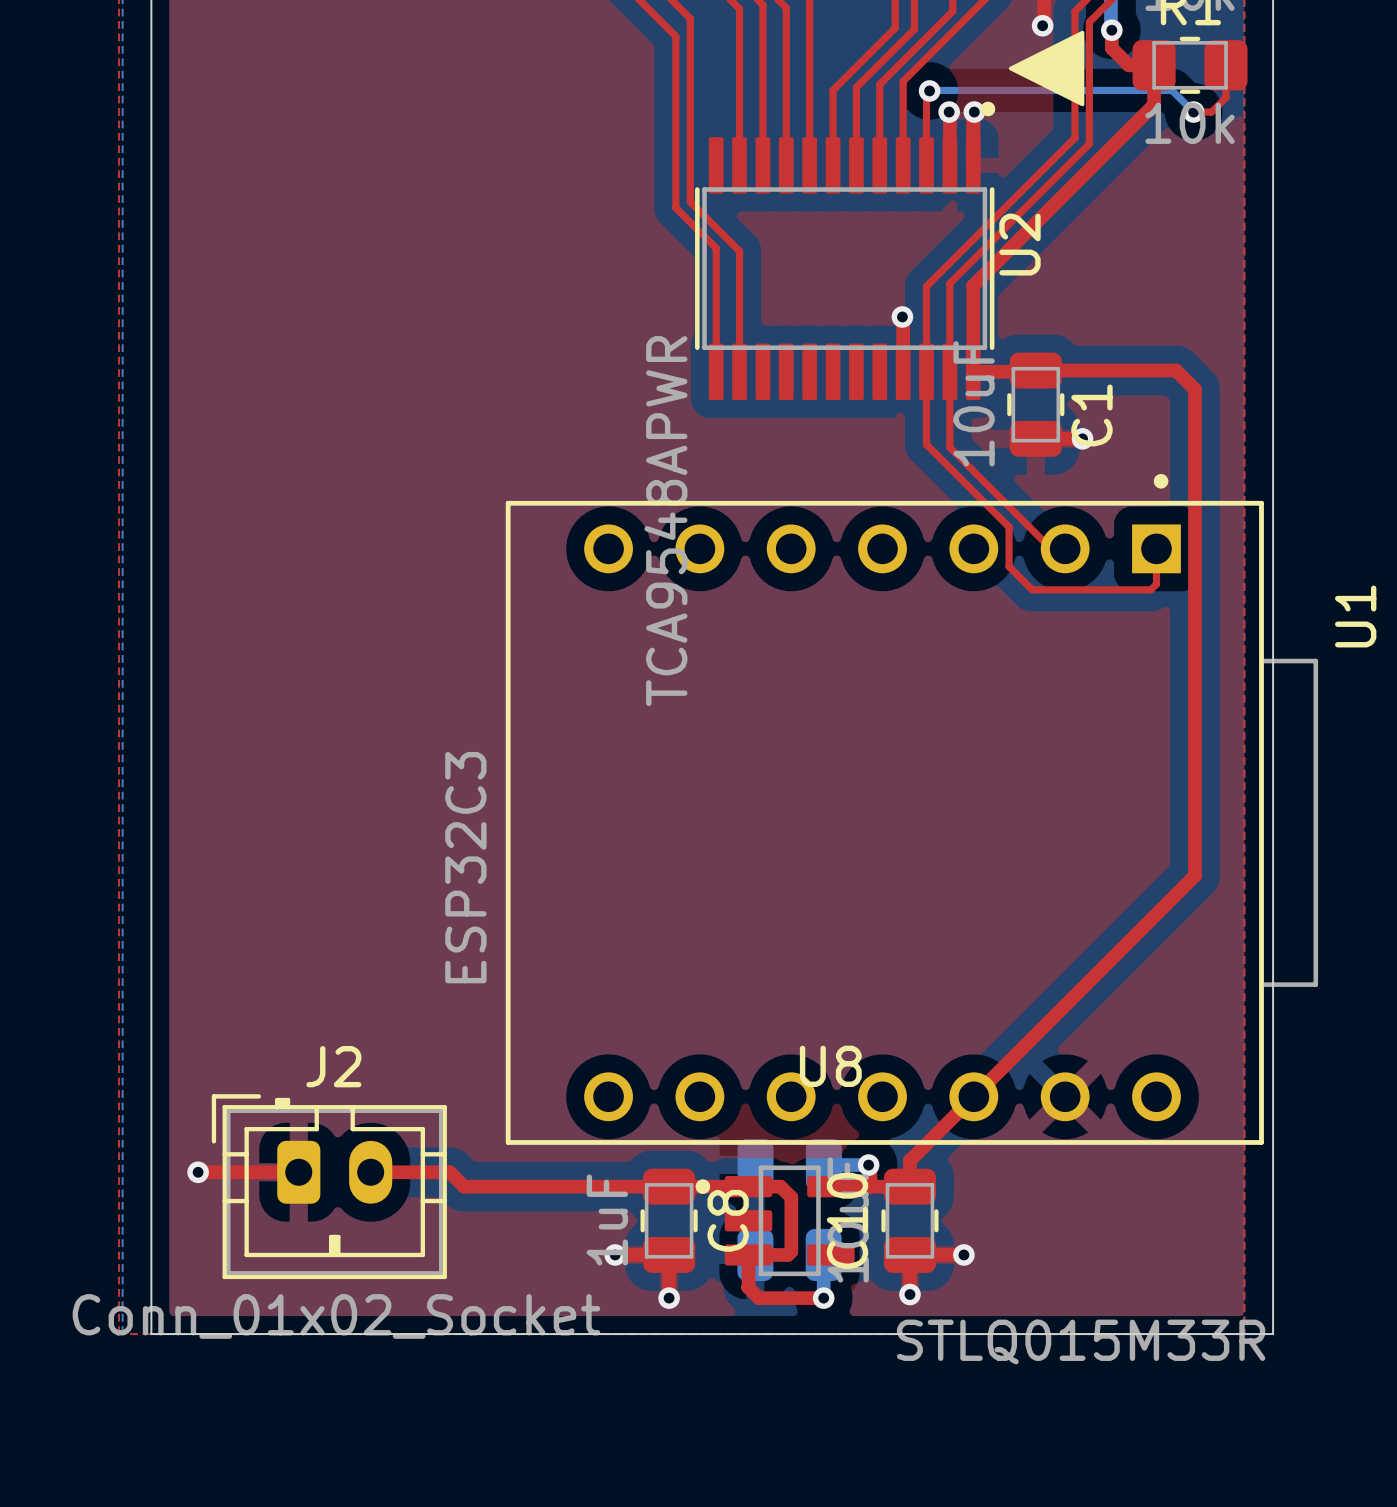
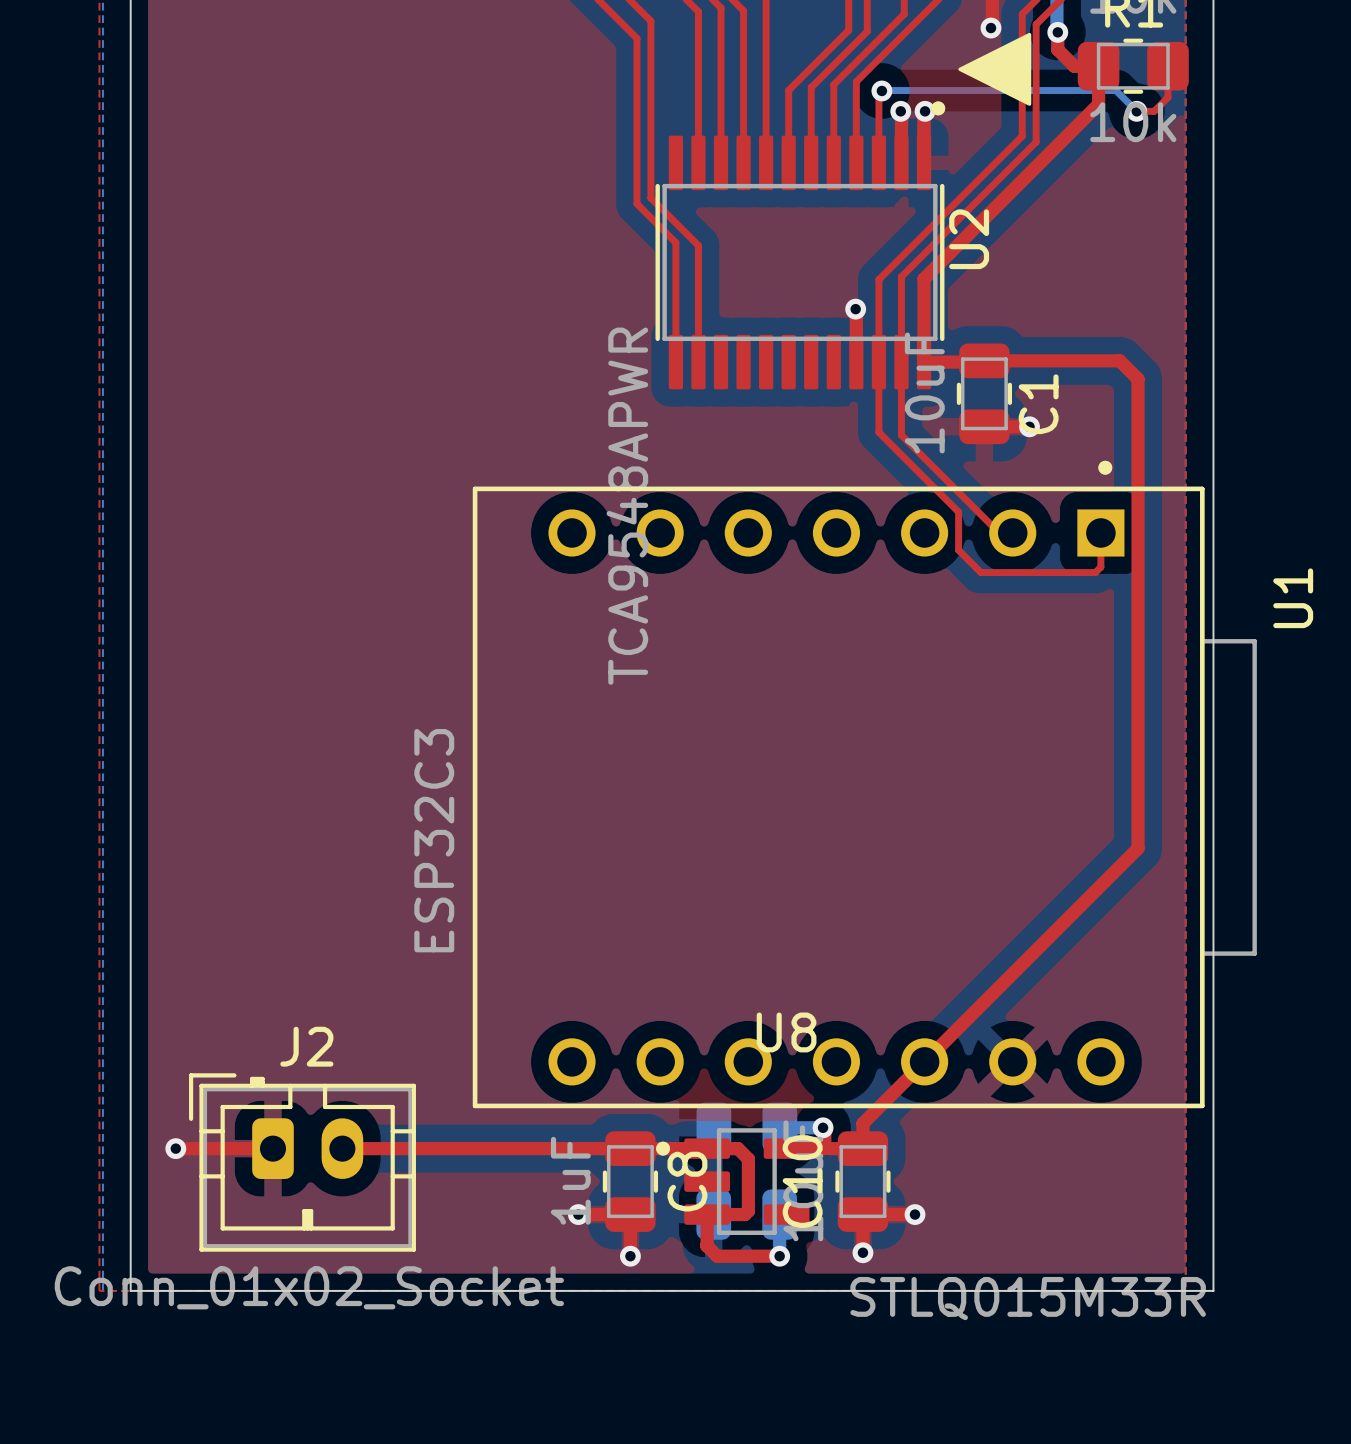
top track: (198, 1172) (298, 1172) -> (175, 1148) (272, 1148)
via position: (198, 1172) -> (175, 1148)
top track: (370, 1172) (449, 1172) (464, 1186) -> (342, 1148) (432, 1148)
J2 position: (329, 1186) -> (302, 1162)

